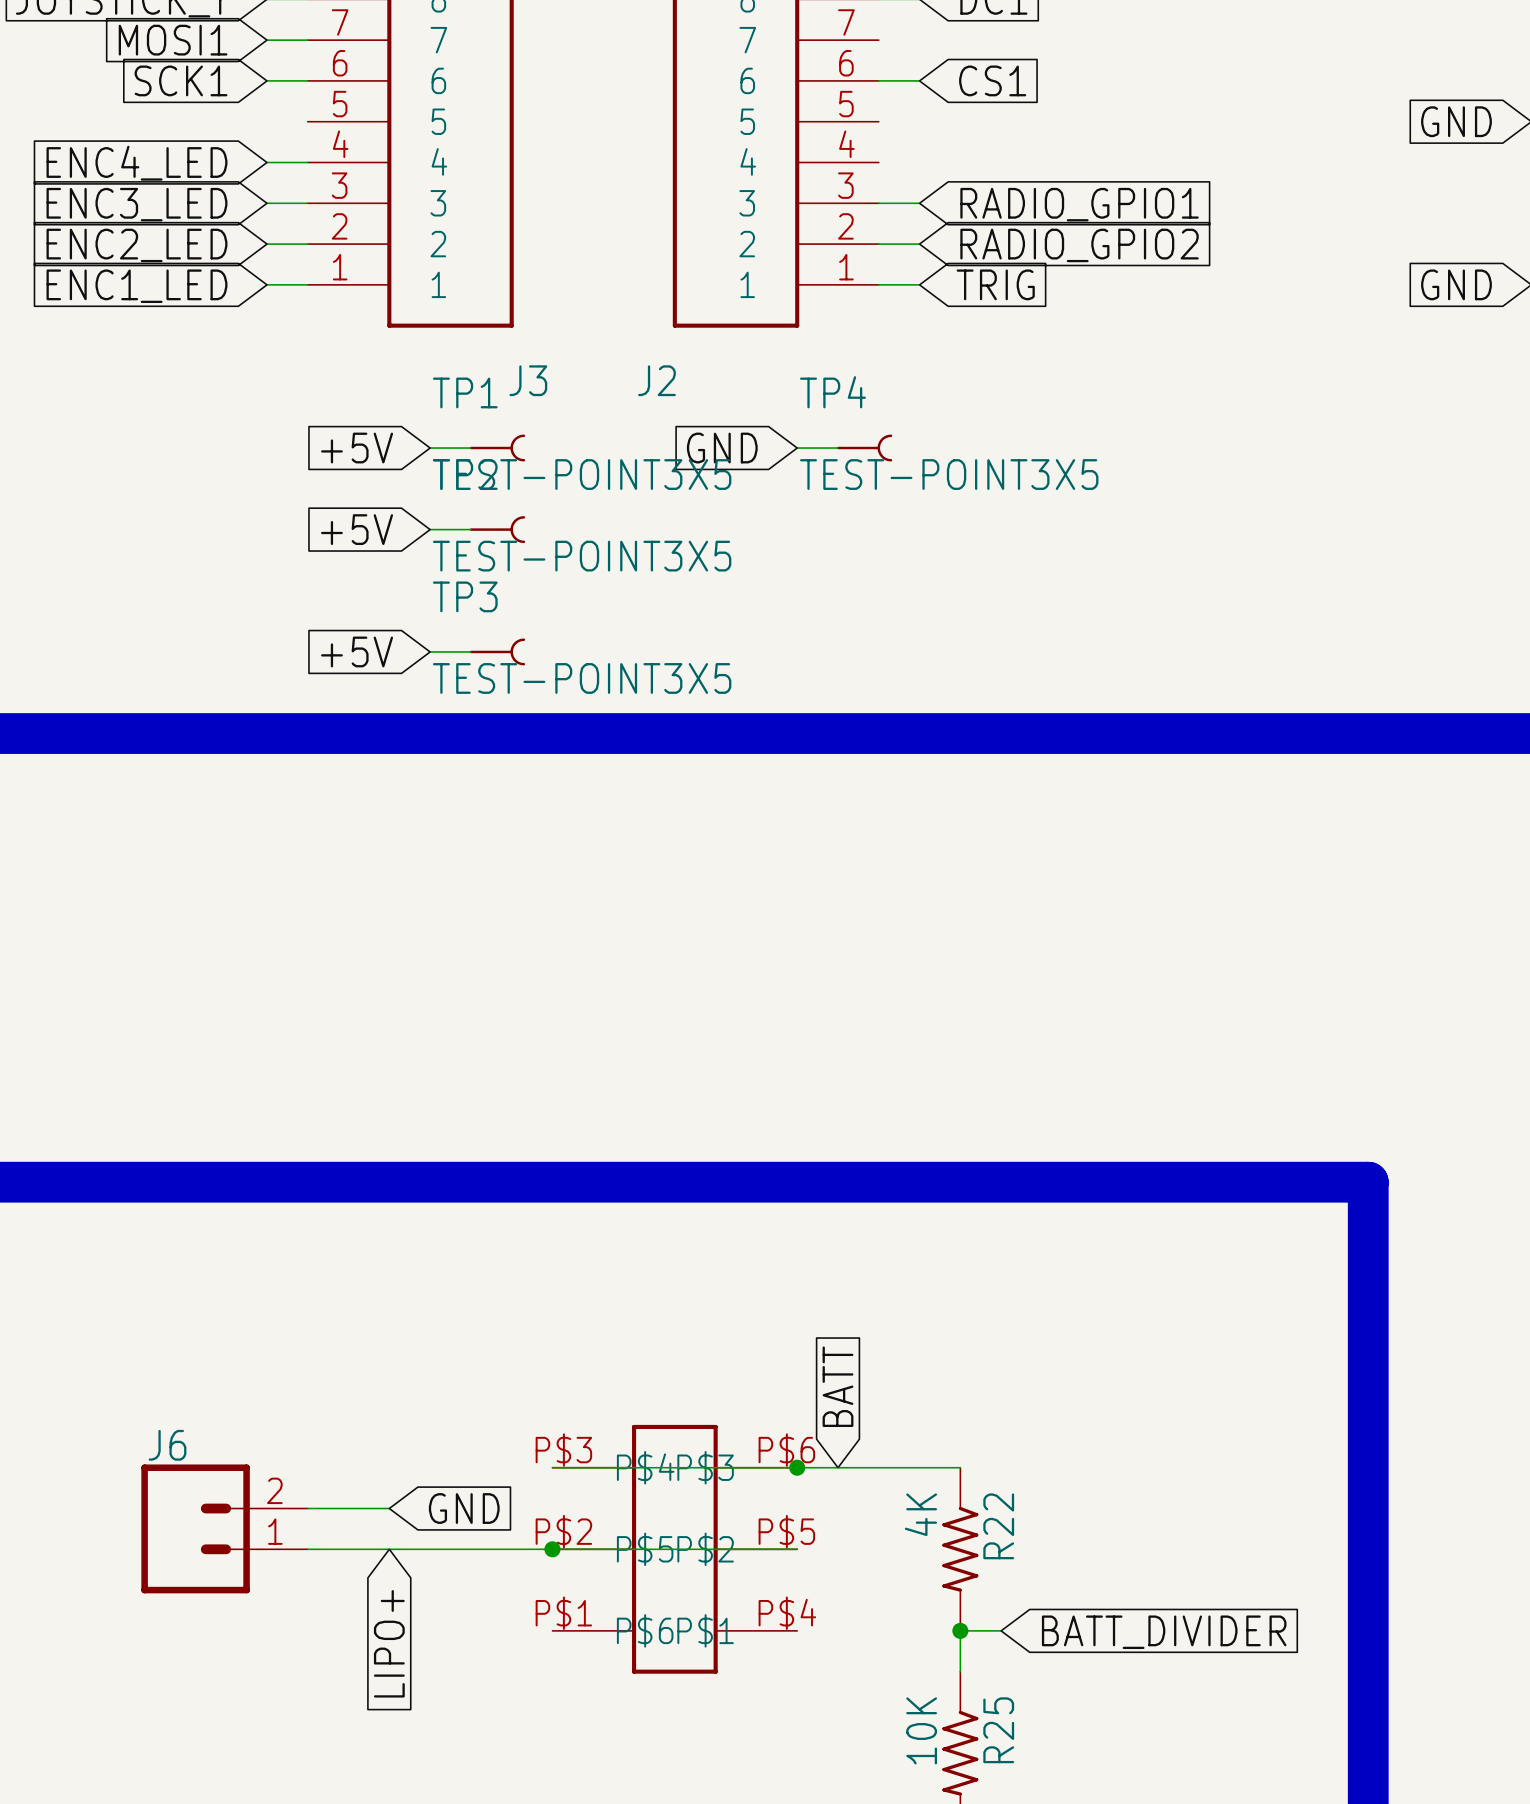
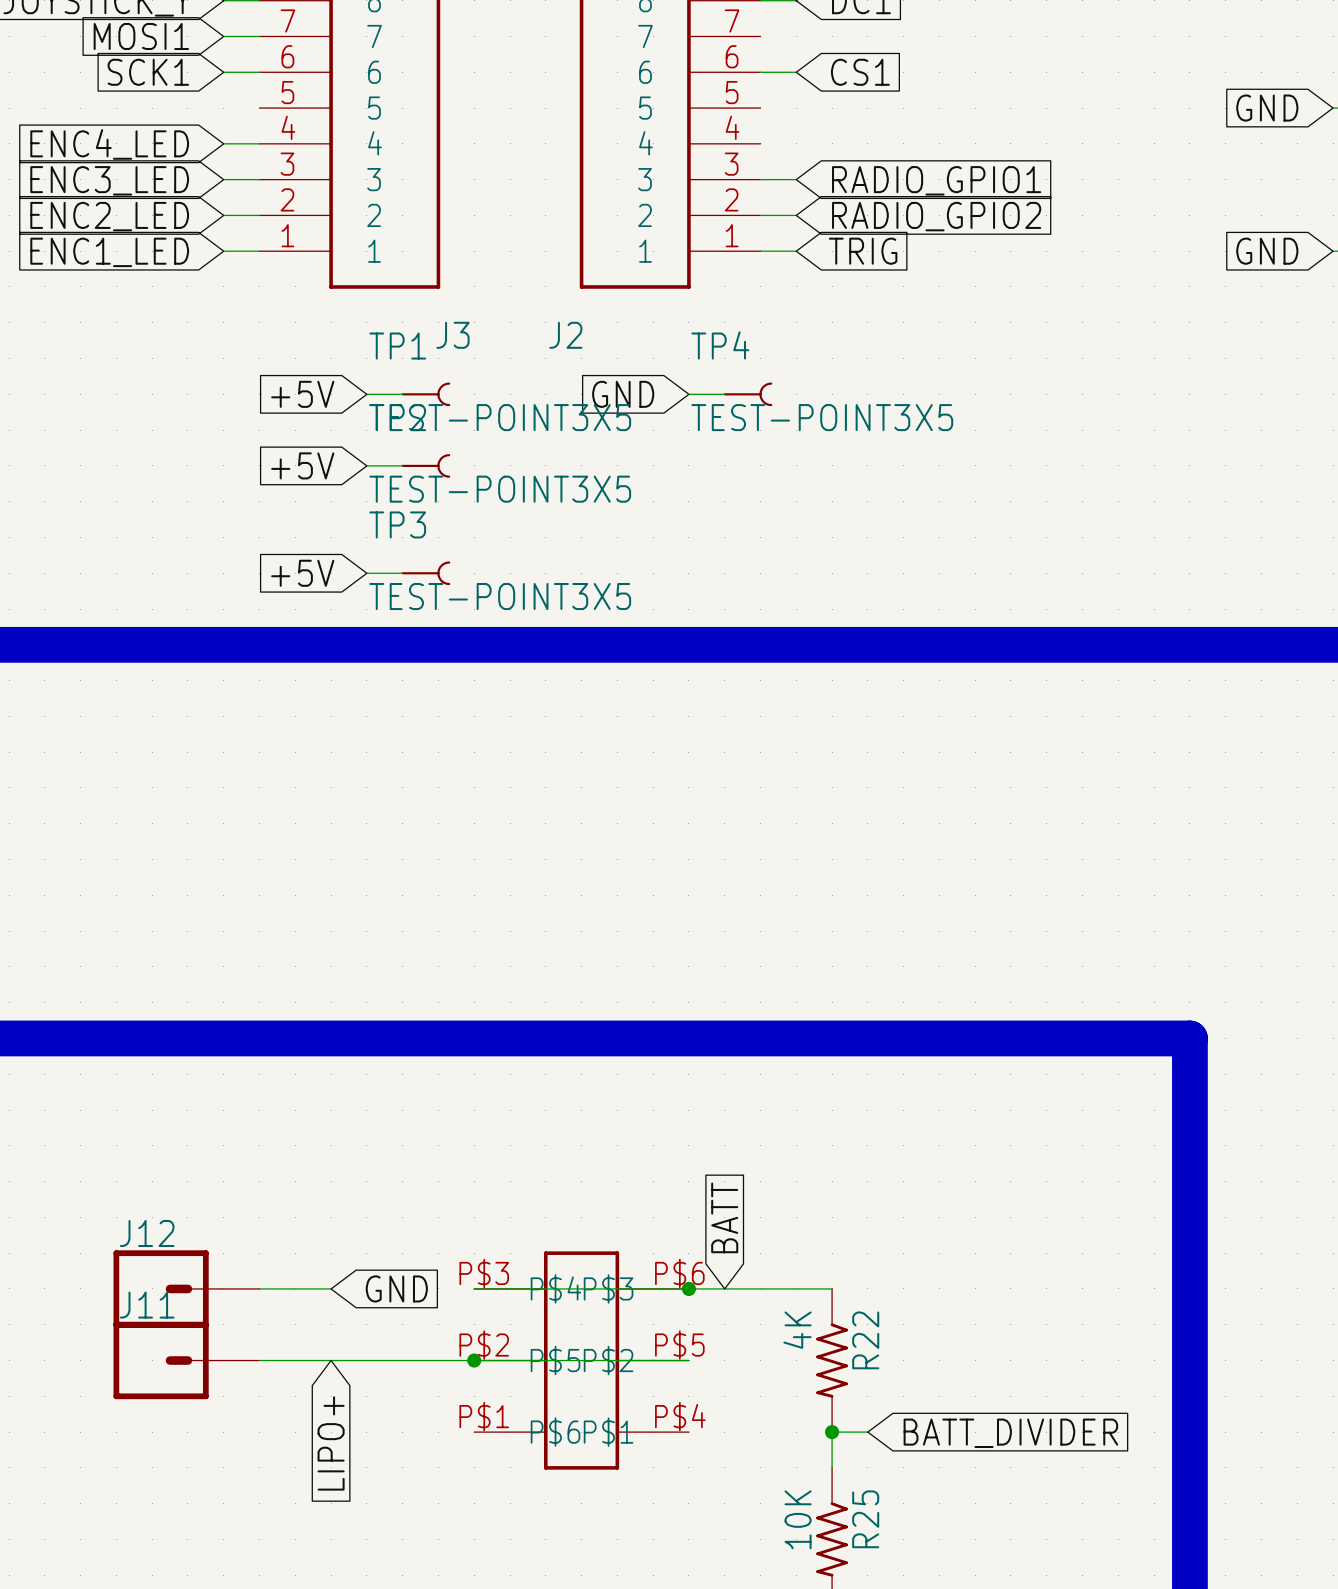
J12: none -> (186, 1288)
wire: (307, 1508) (389, 1508) -> (259, 1288) (331, 1288)
global label position: GND (464, 1508) -> GND (396, 1288)
J6: (224, 1528) -> none
J11: none -> (186, 1360)

